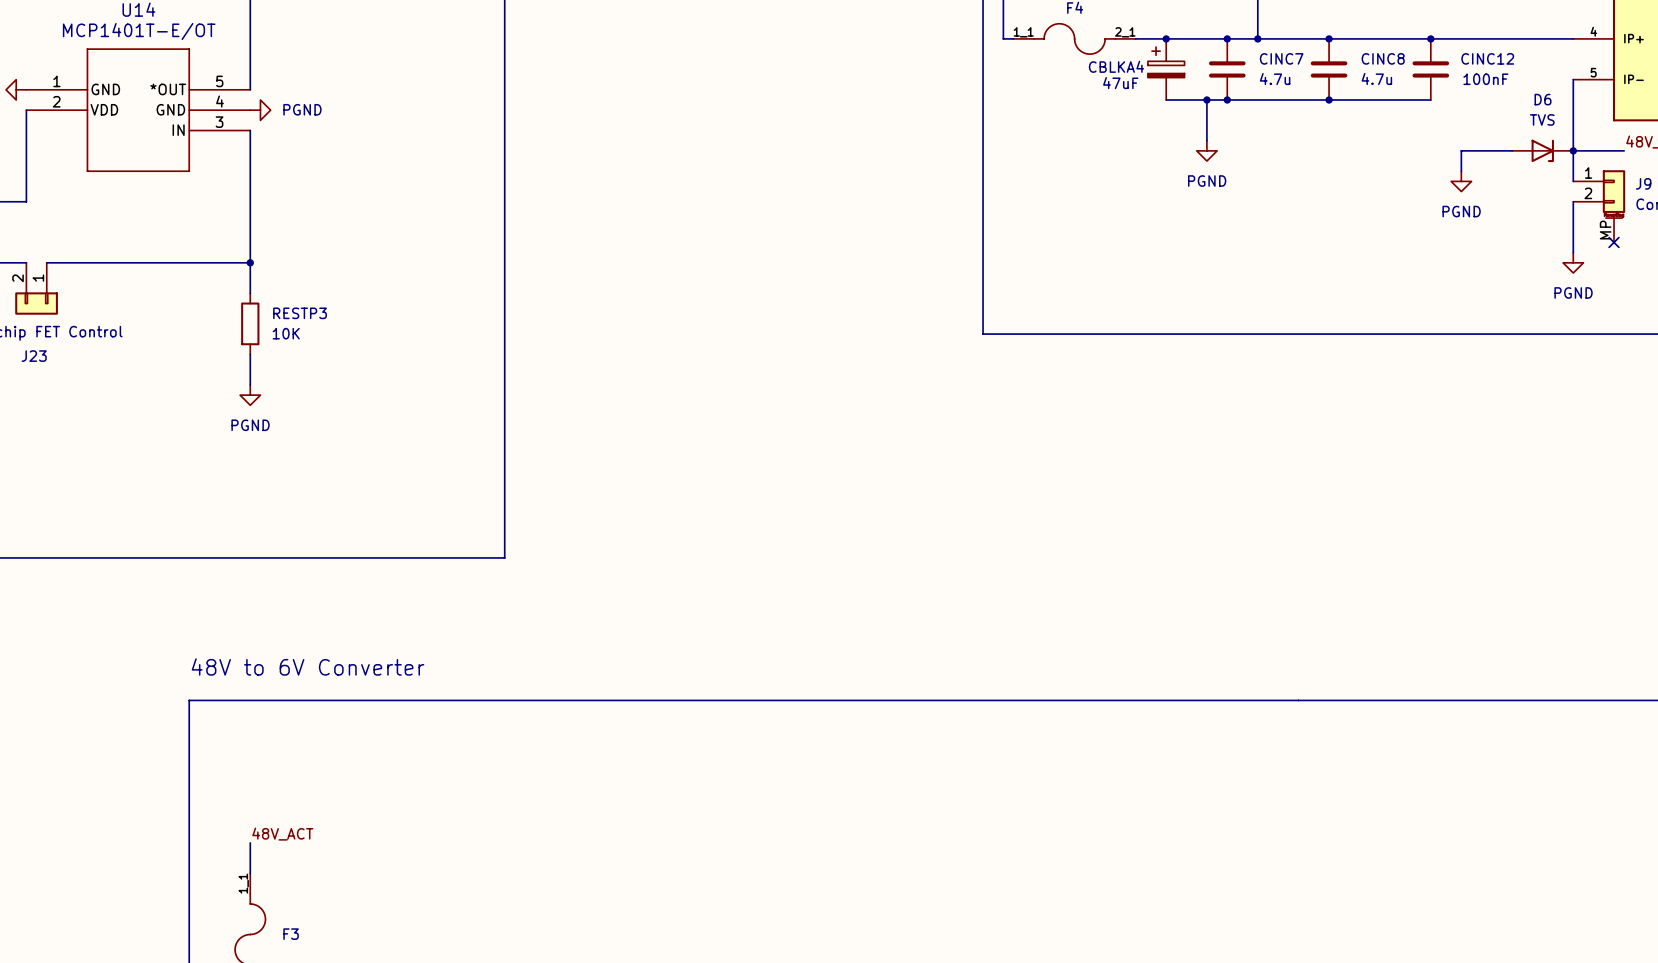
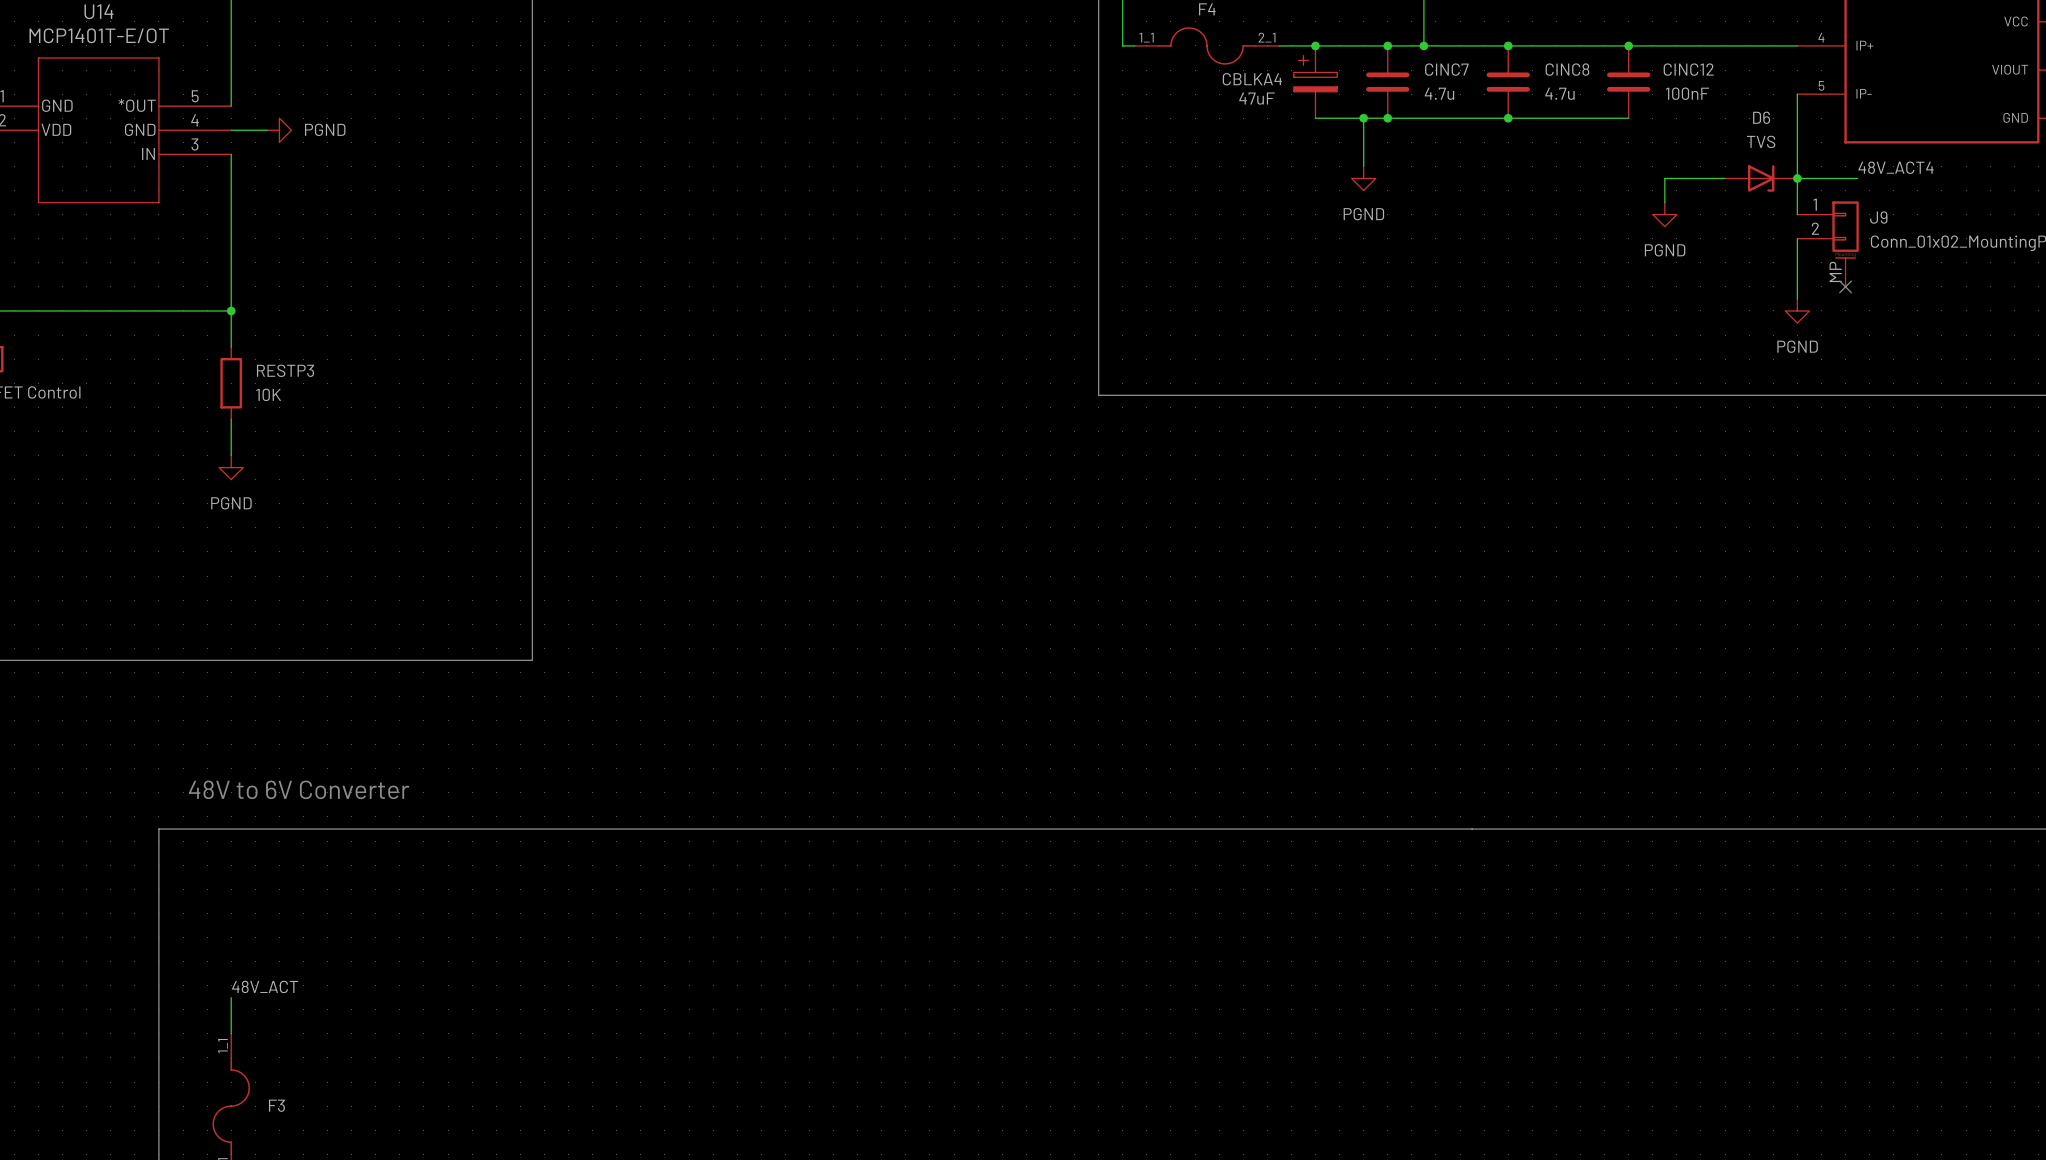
wire: none -> (231, 130) (267, 130)
power symbol position: PGND (260, 110) -> PGND (279, 130)

